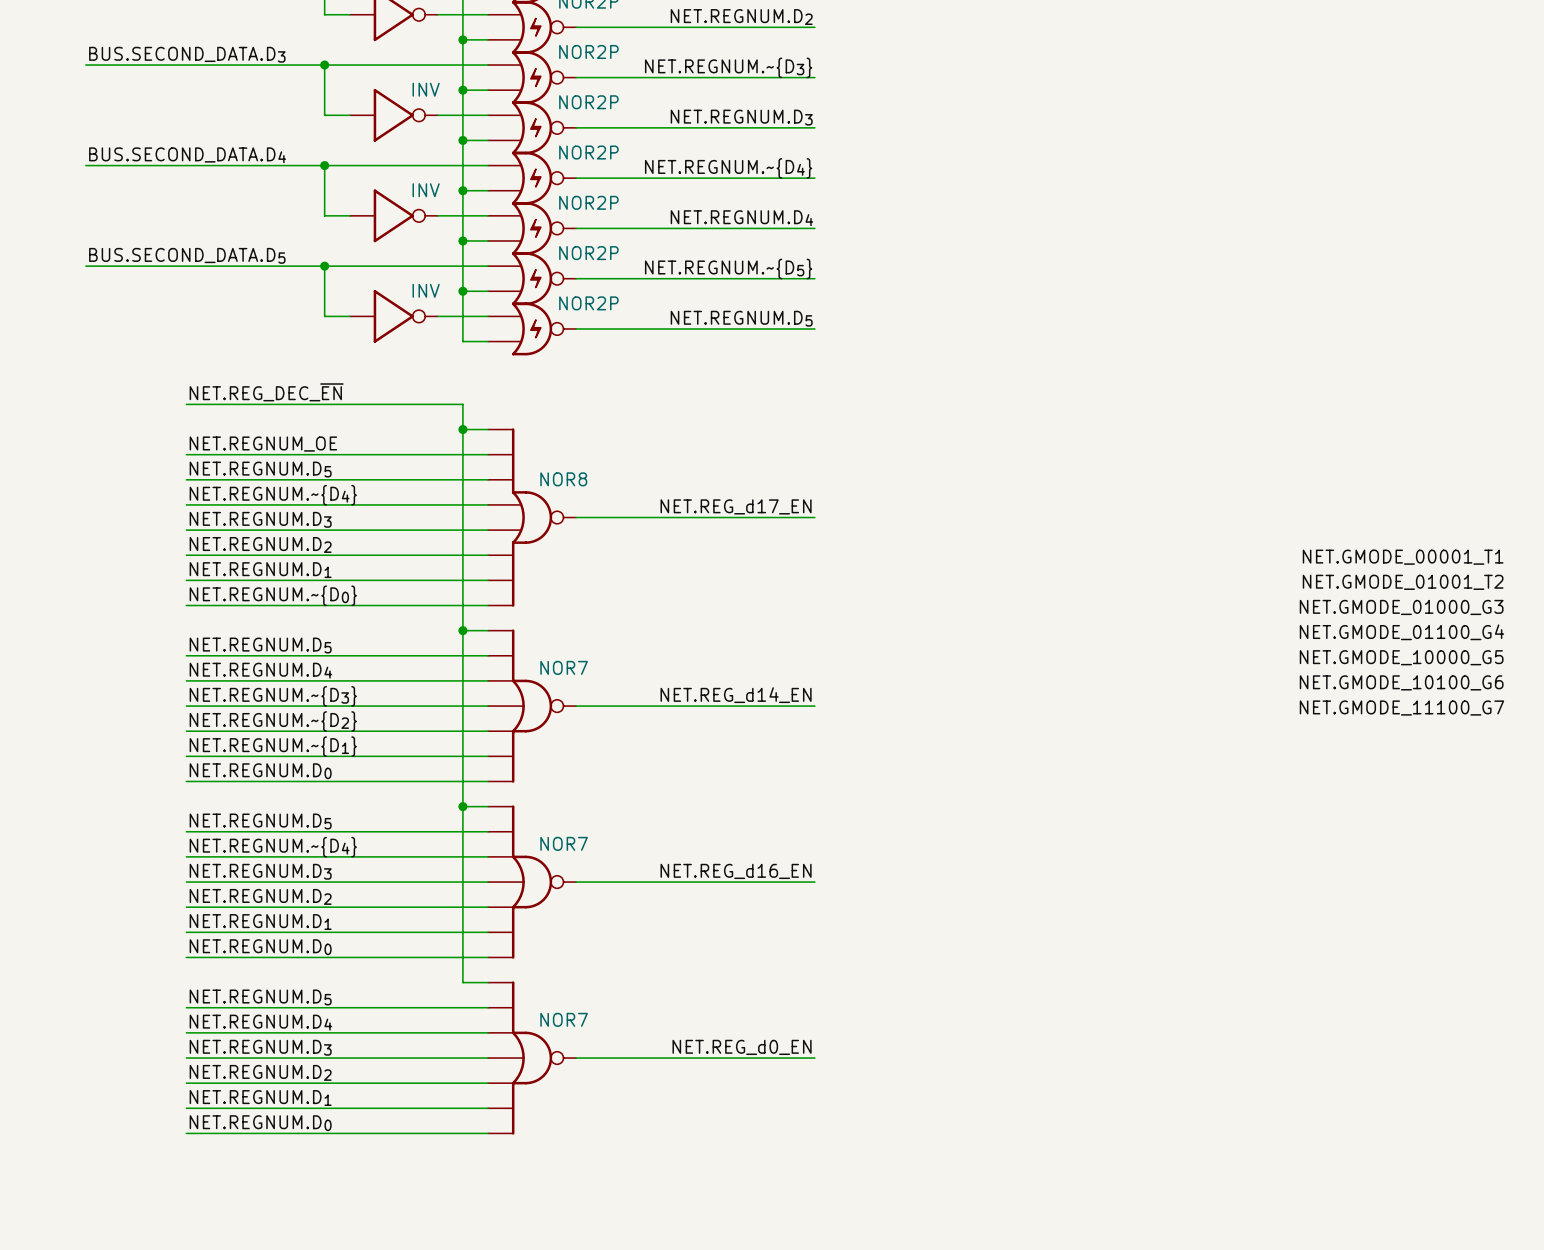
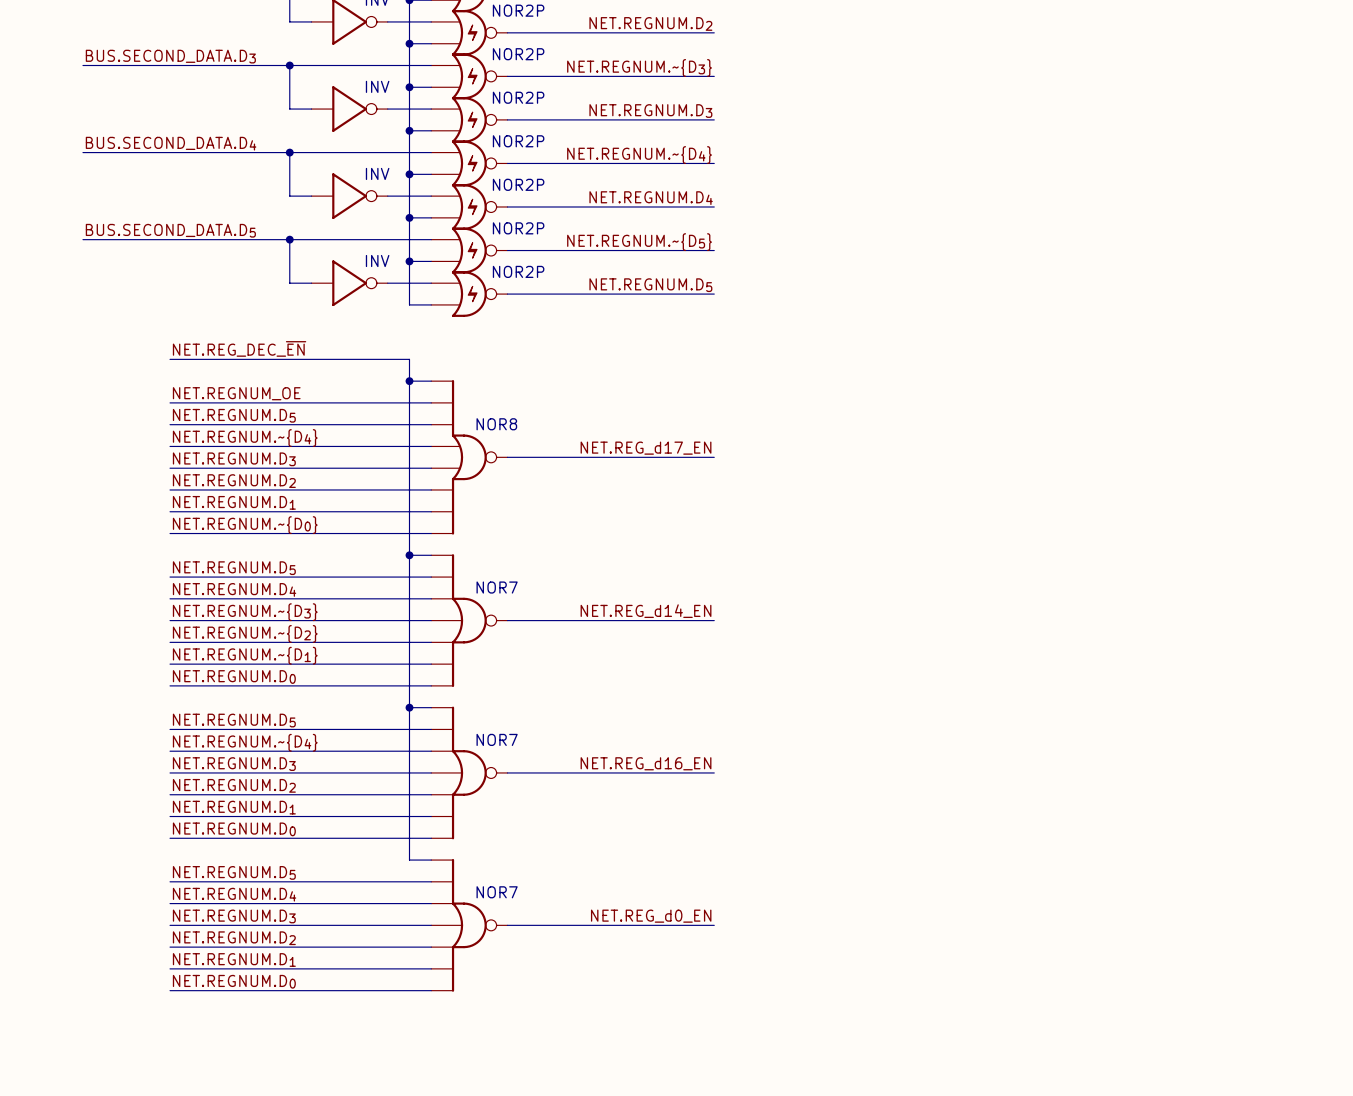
label: NET.GMODE_00001_T1 (1403, 557) -> none
label: NET.GMODE_01001_T2 (1403, 582) -> none
label: NET.GMODE_01000_G3 (1401, 607) -> none
label: NET.GMODE_01100_G4 (1401, 632) -> none
label: NET.GMODE_10000_G5 (1401, 657) -> none
label: NET.GMODE_10100_G6 (1401, 682) -> none
label: NET.GMODE_11100_G7 (1401, 708) -> none

